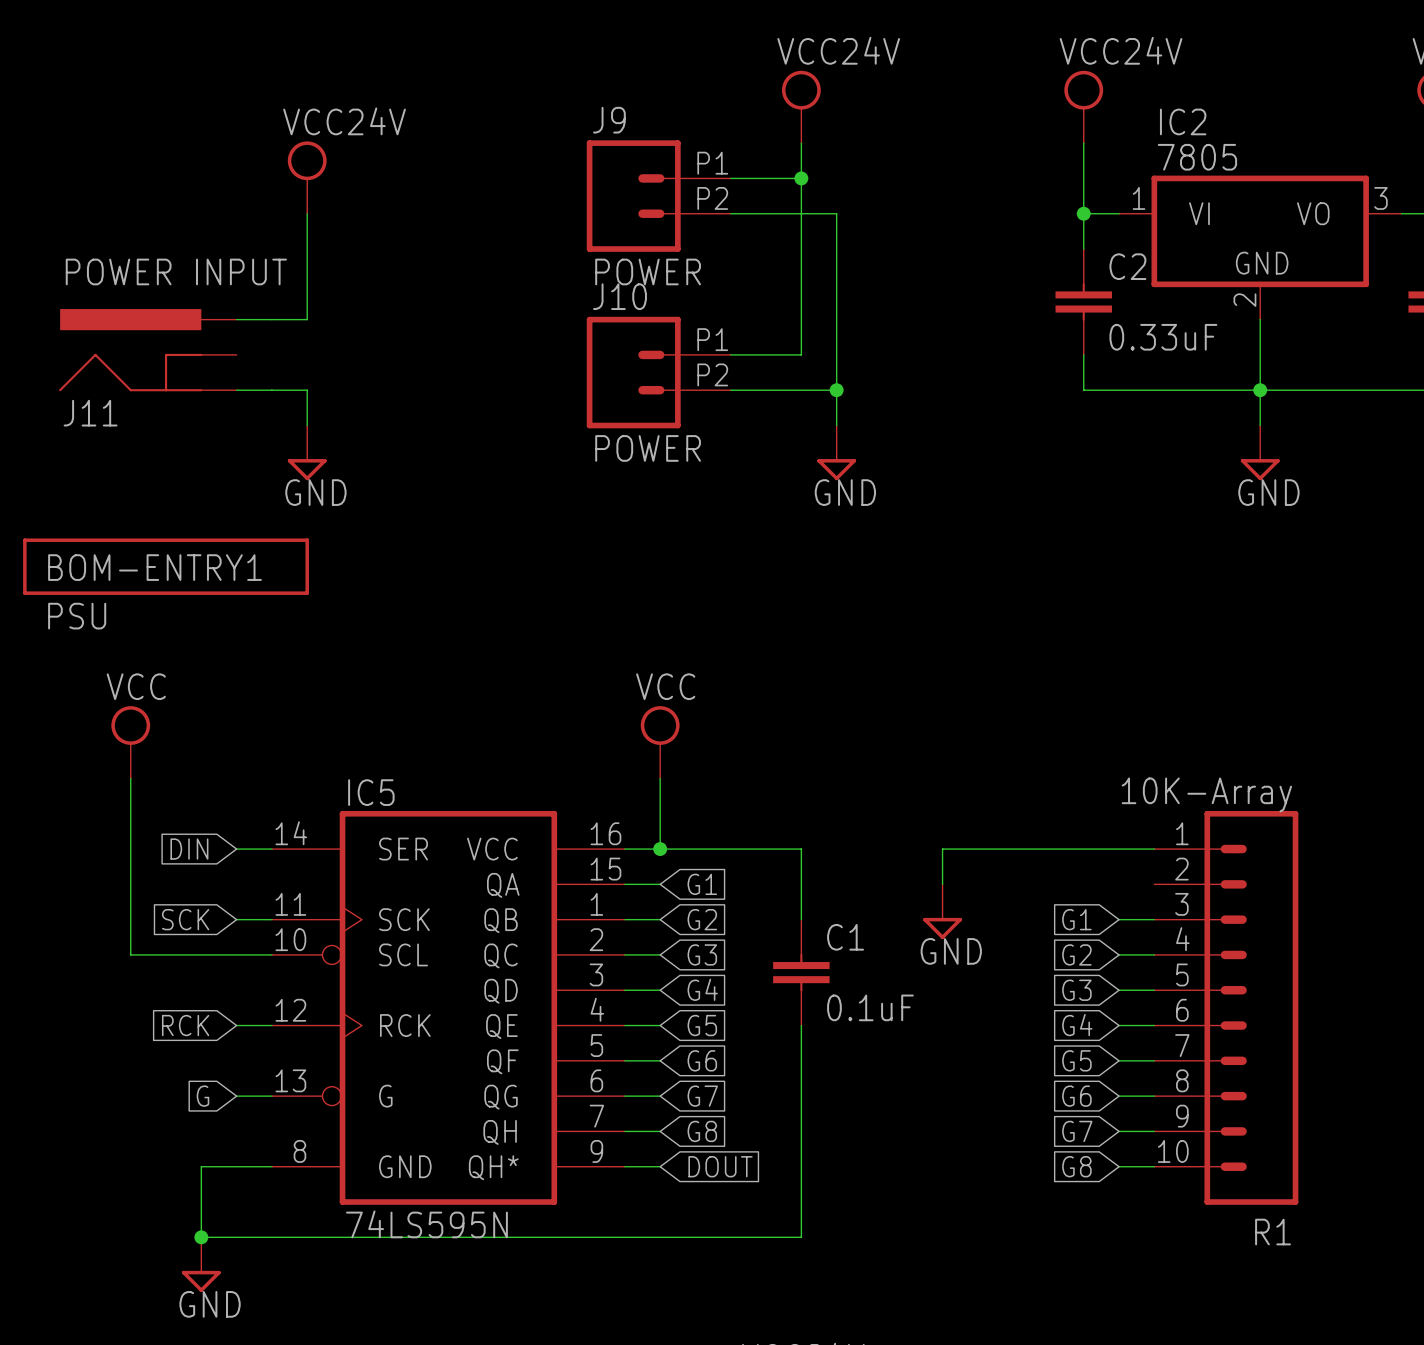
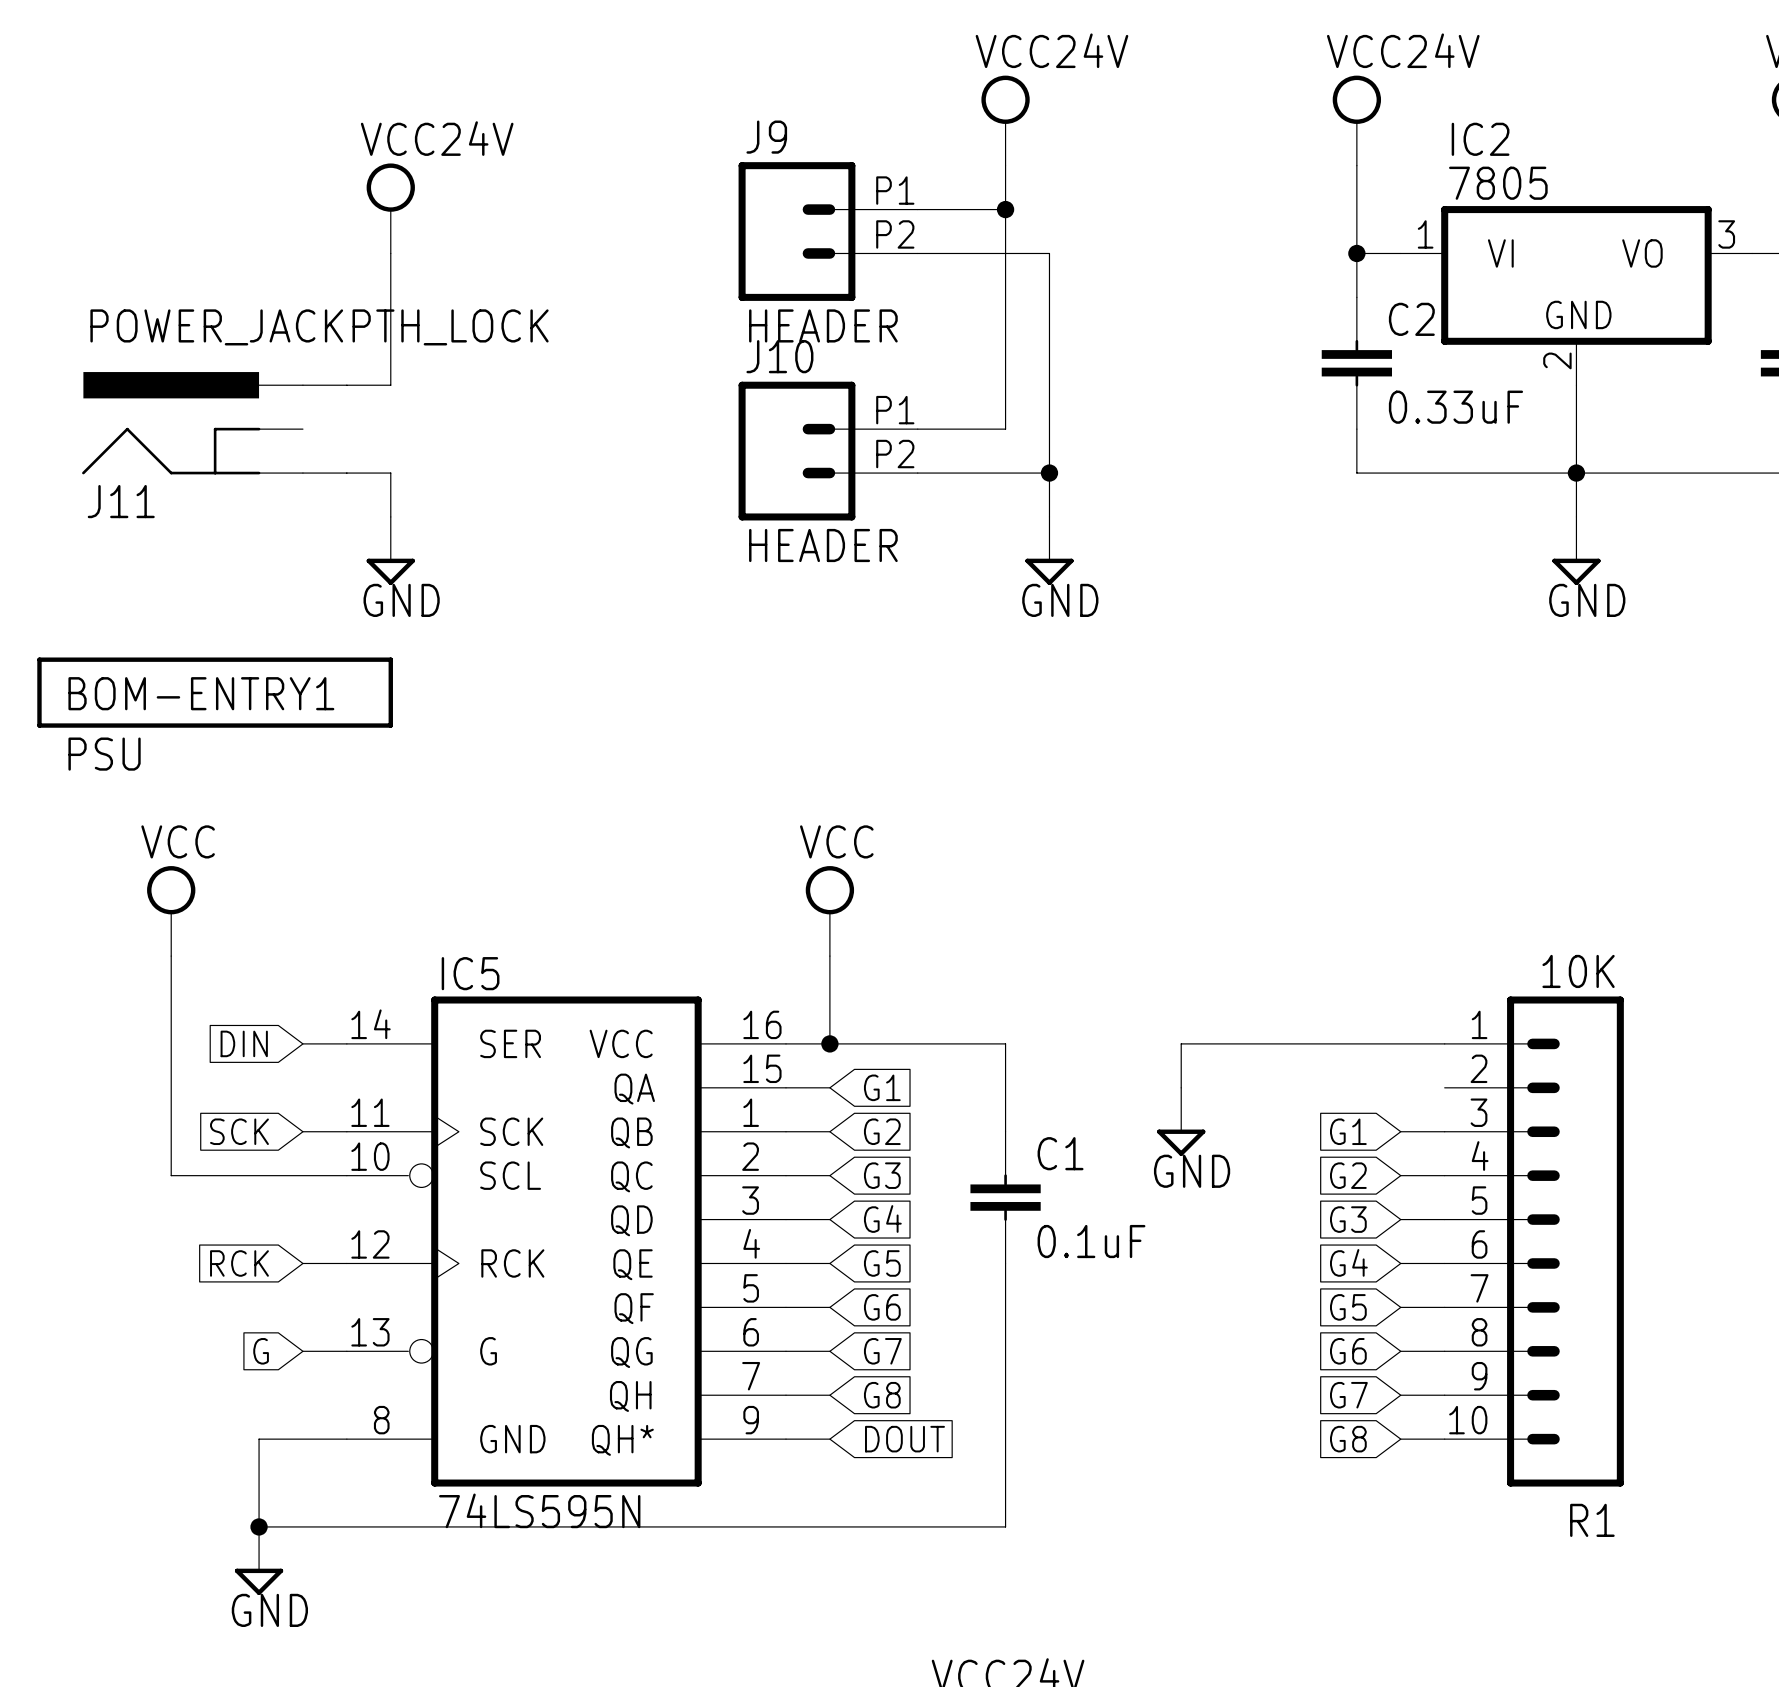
J11 value: POWER INPUT (176, 271) -> POWER_JACKPTH_LOCK (319, 327)
J9 value: POWER (648, 271) -> HEADER (823, 325)
J10 value: POWER (648, 448) -> HEADER (823, 545)
R1 value: 10K-Array (1206, 794) -> 10K (1578, 971)

